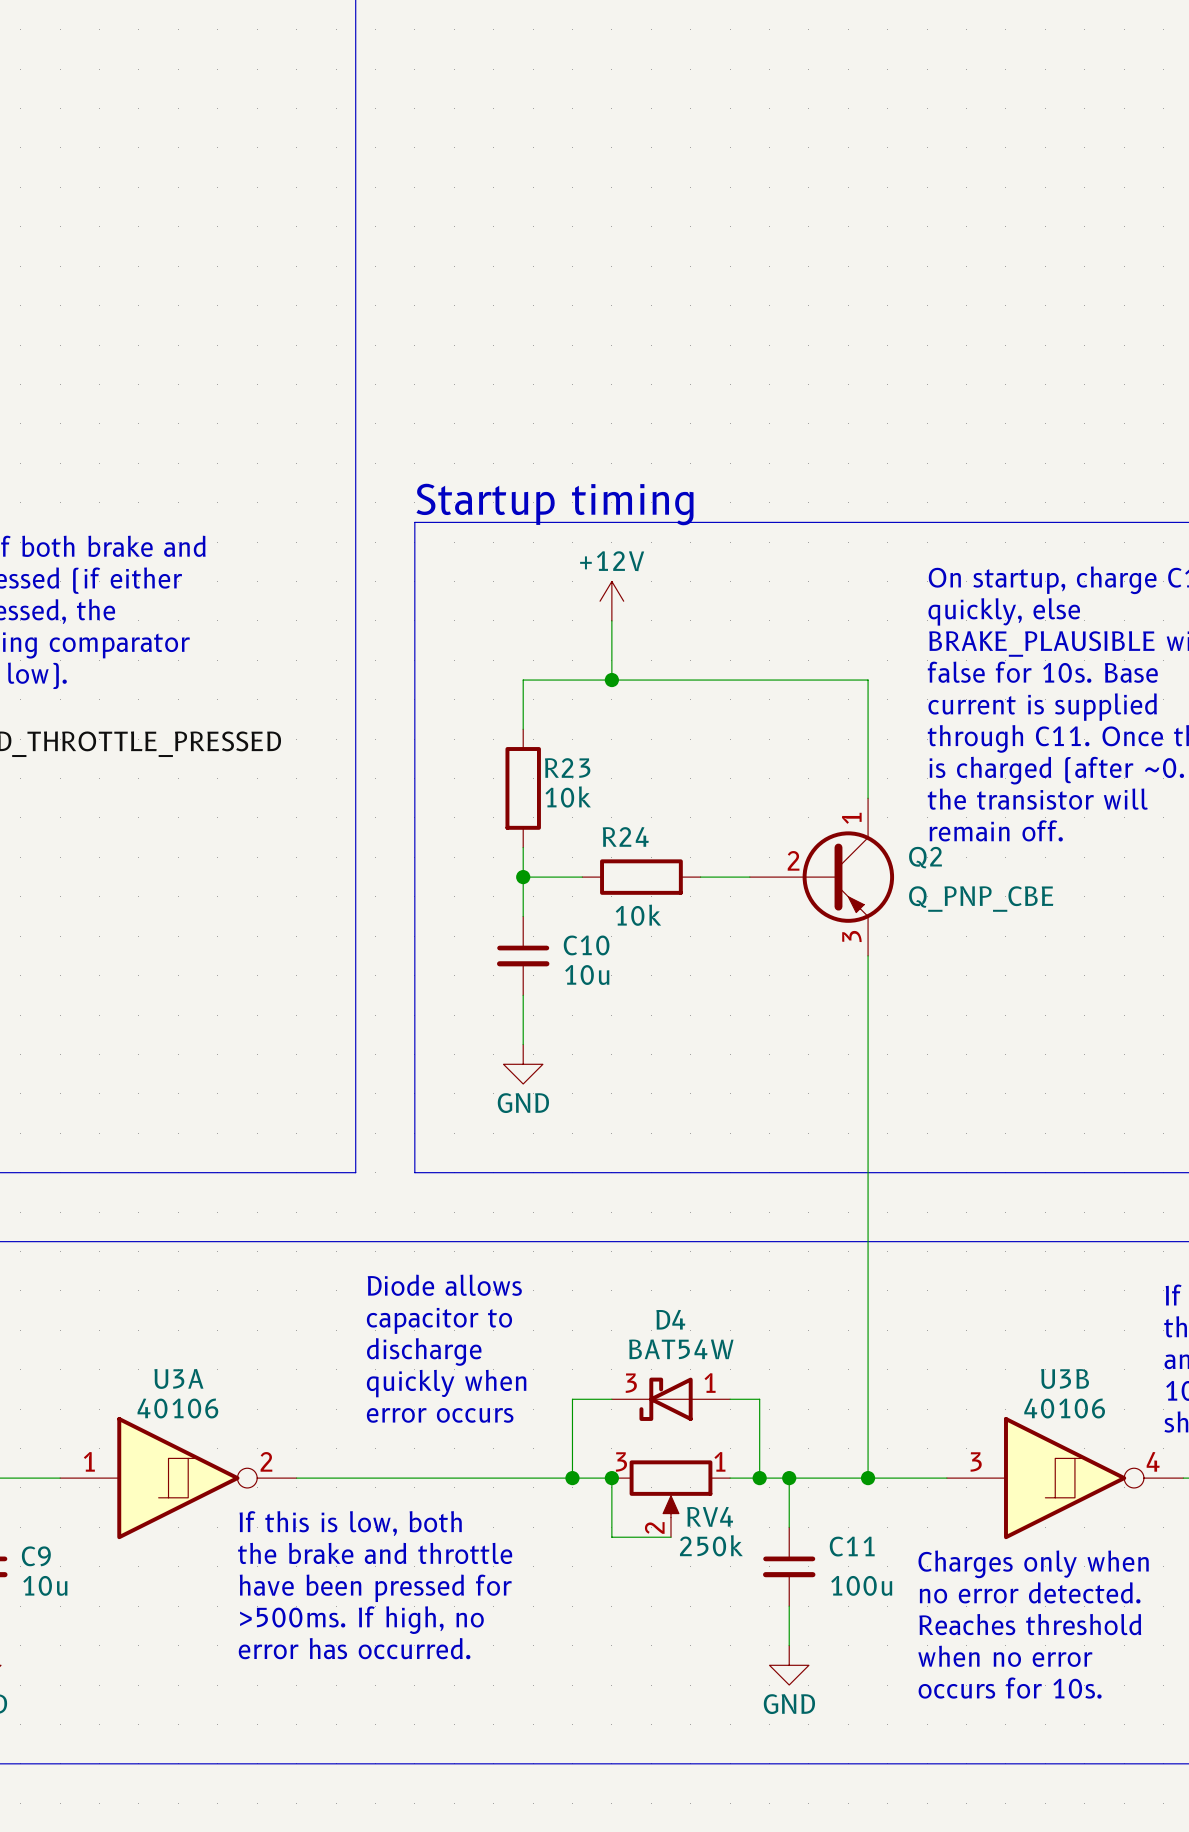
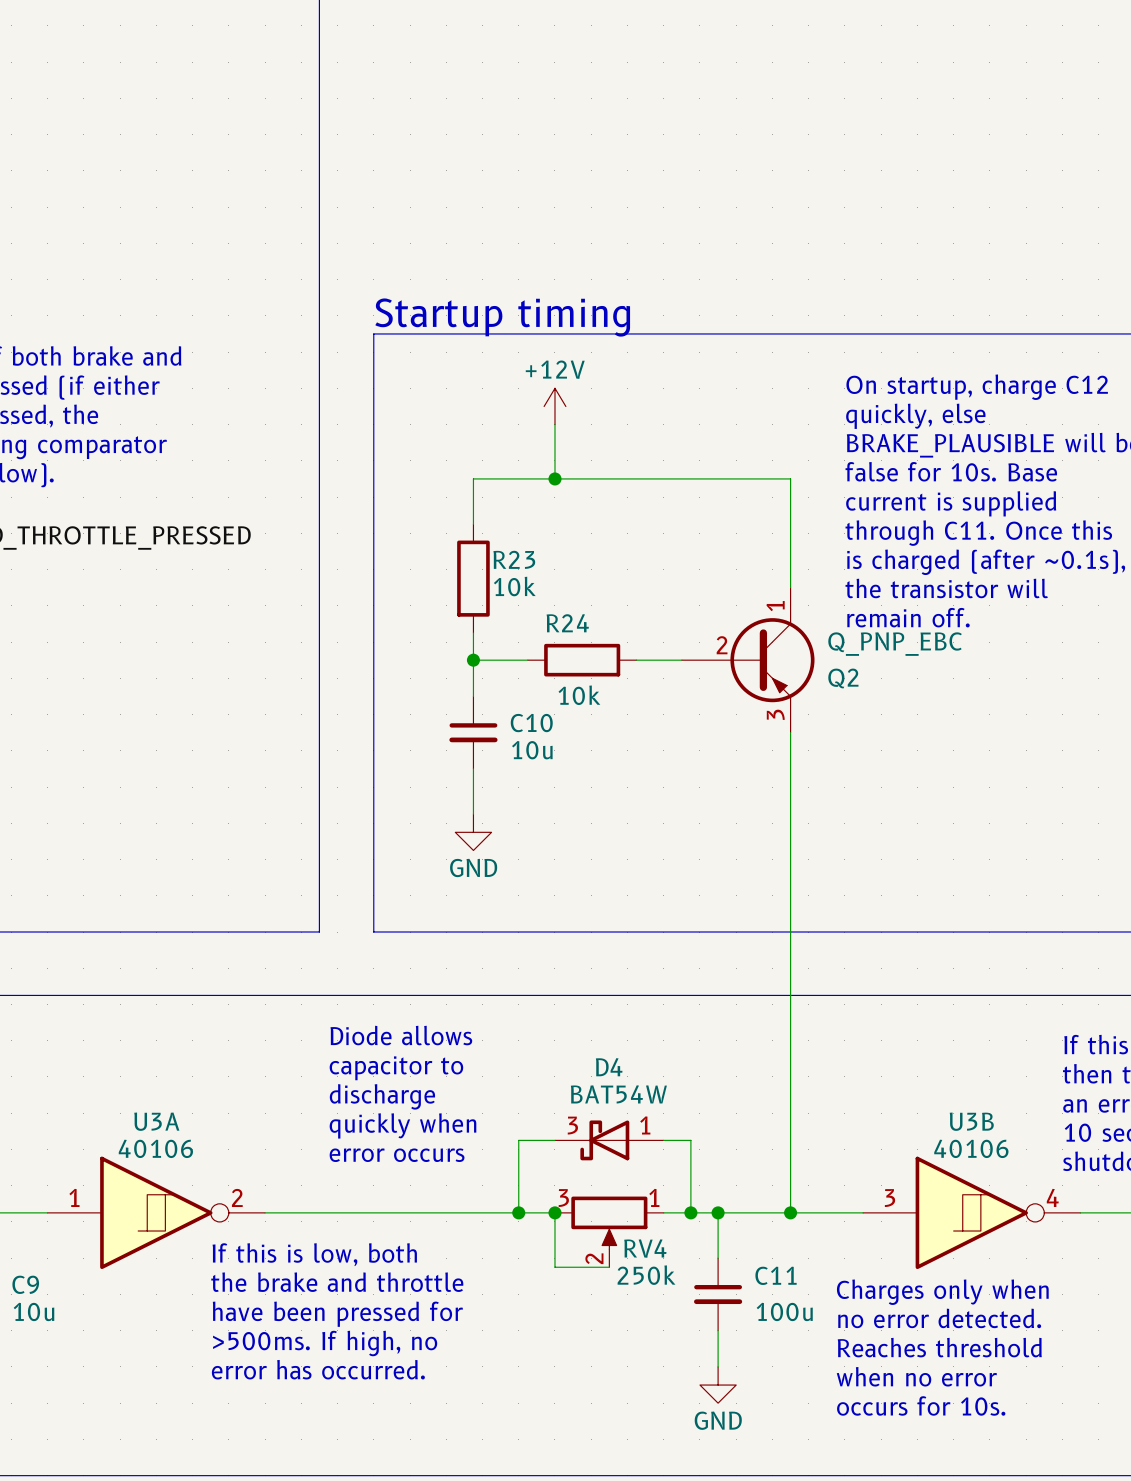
Q2 name position: Q2 (925, 857) -> Q2 (843, 678)
Q2 value: Q_PNP_CBE (981, 899) -> Q_PNP_EBC (895, 644)

